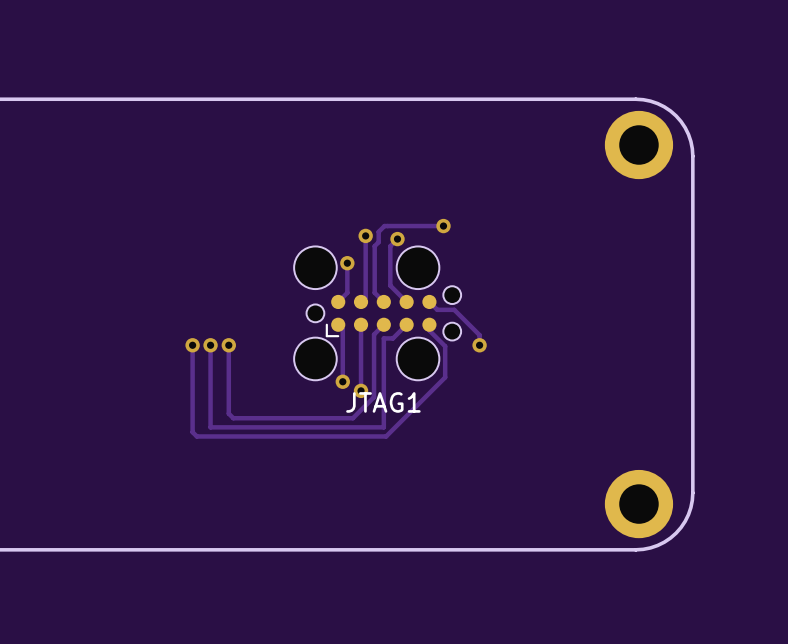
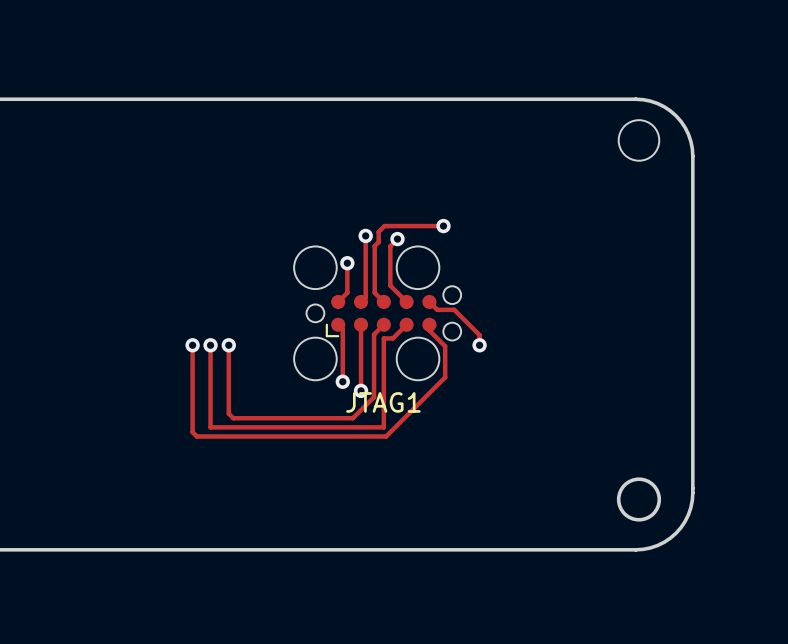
round board edge: none -> [618, 120, 660, 161]
part: (638, 145) -> none
round board edge: none -> [616, 477, 662, 522]
part: (638, 504) -> none

